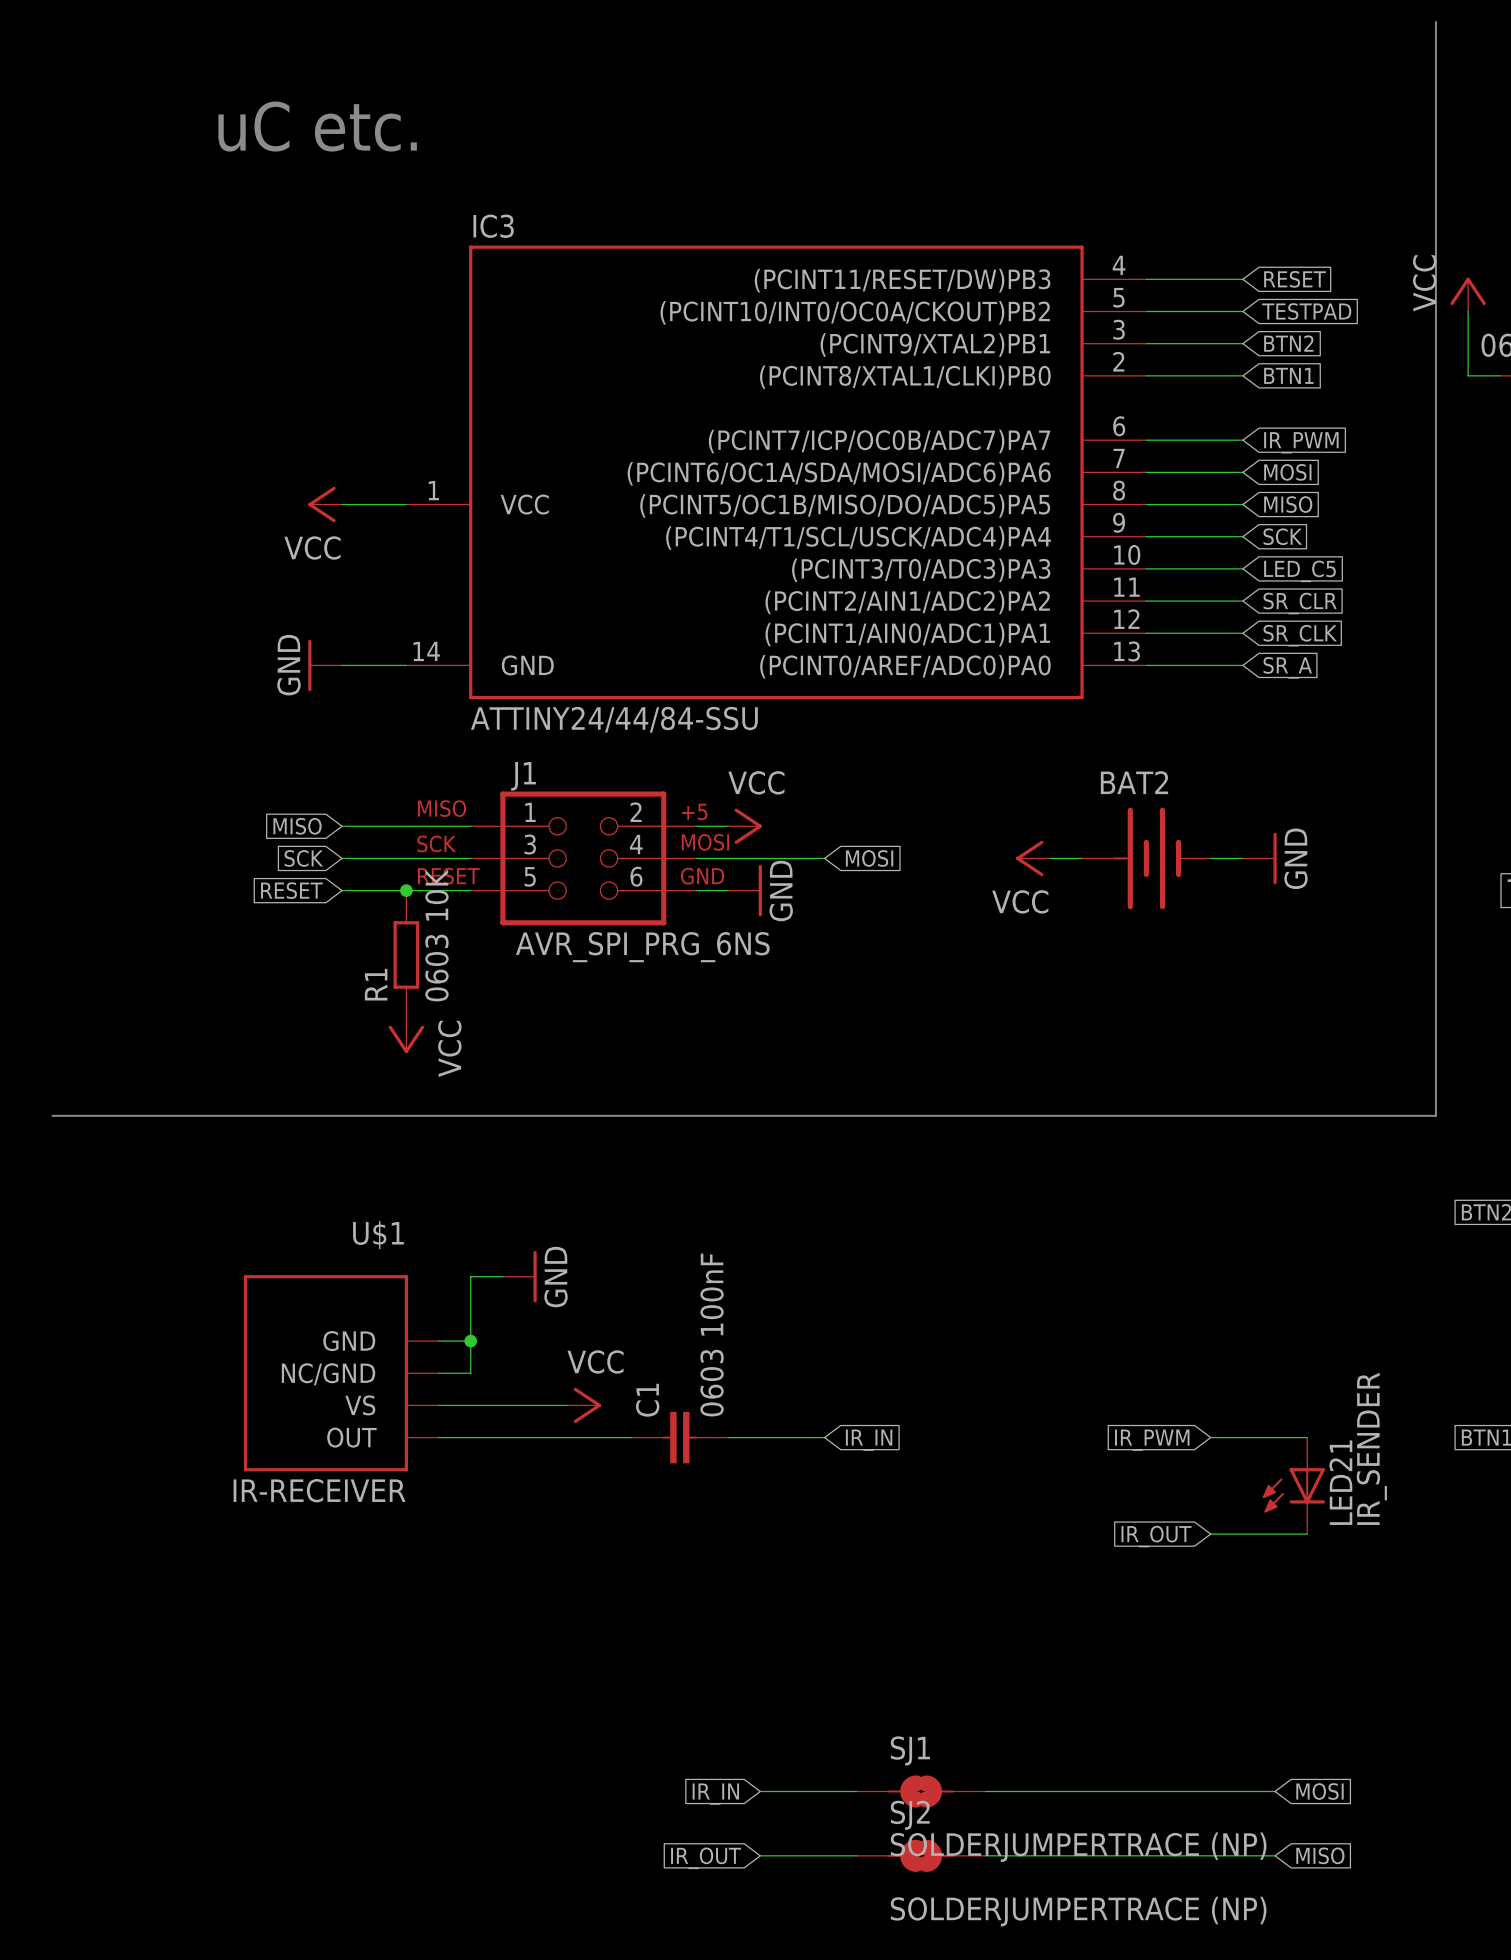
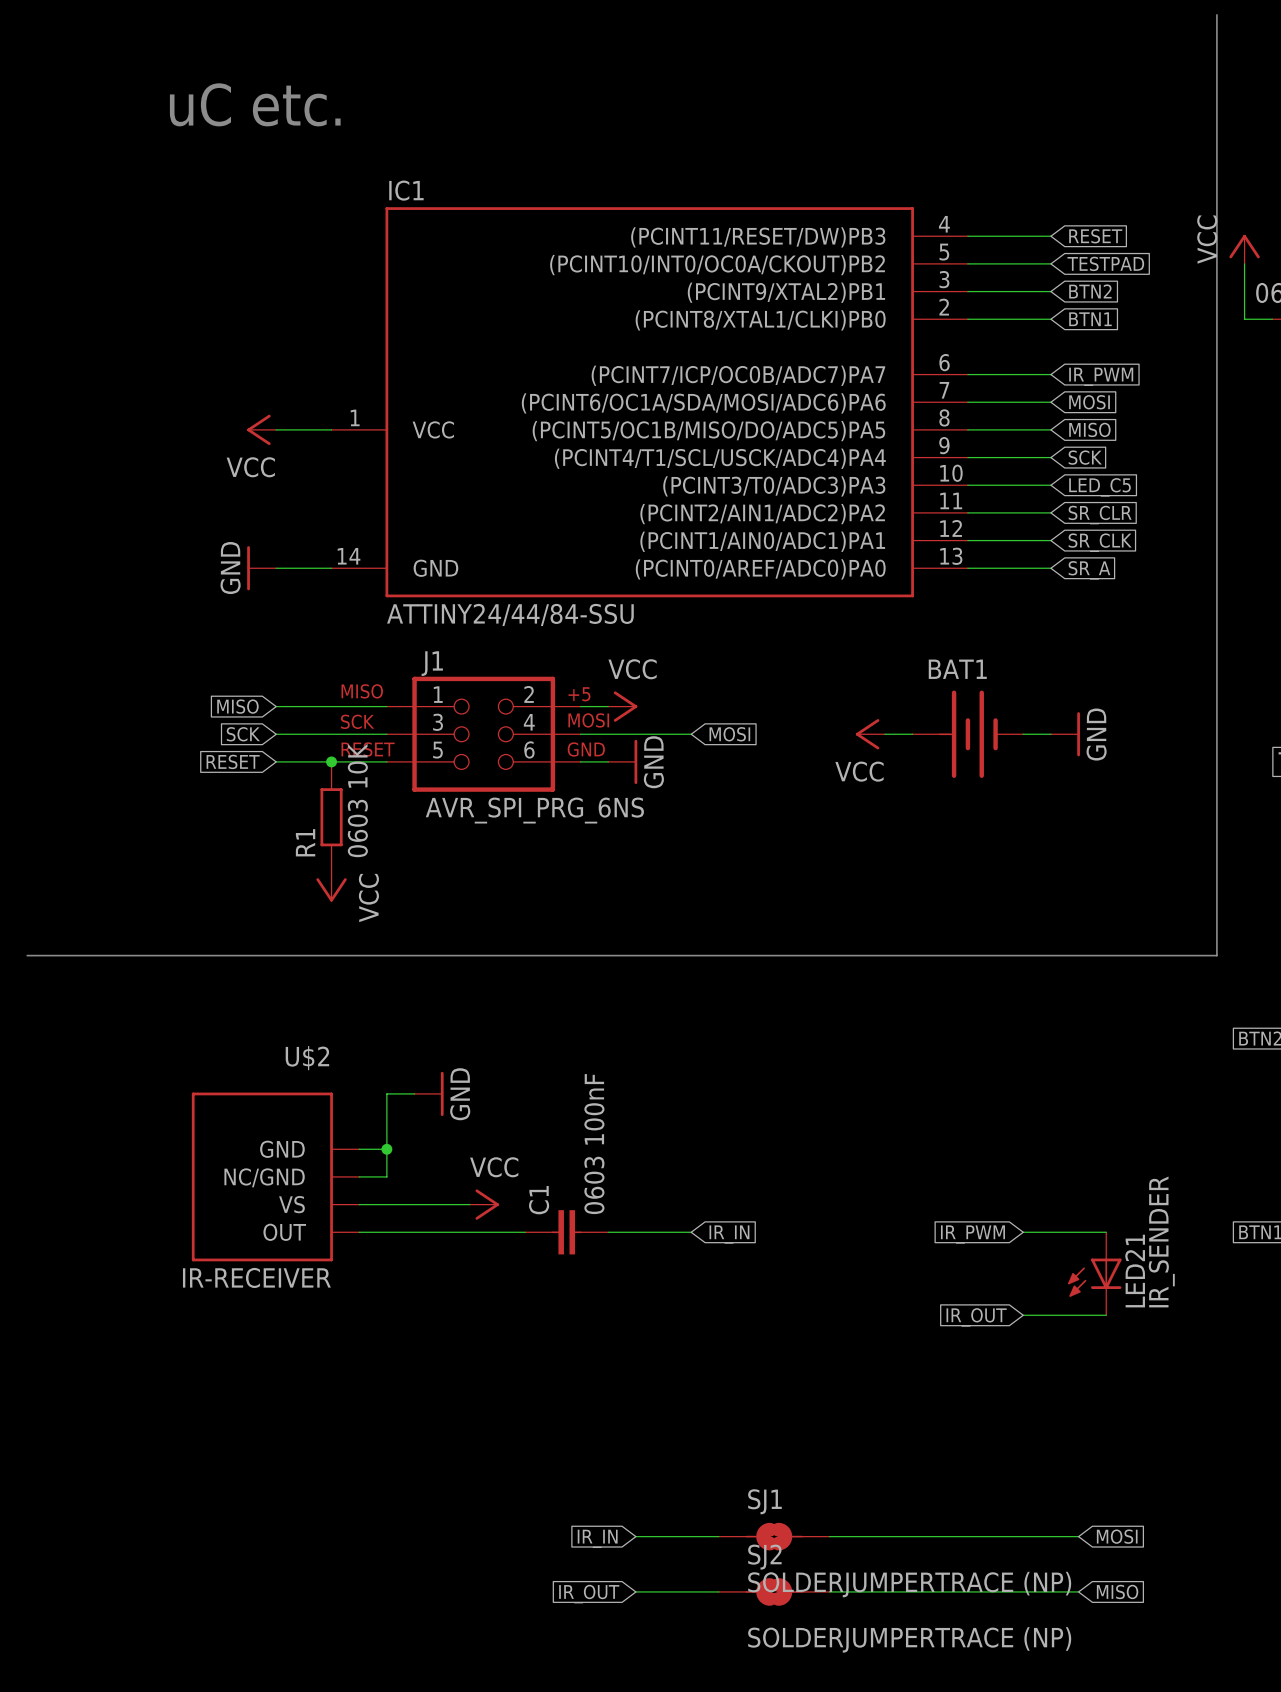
IC3 name: IC3 (493, 226) -> IC1 (406, 190)
BAT2 name: BAT2 (1134, 782) -> BAT1 (957, 669)
U$1 name: U$1 (378, 1235) -> U$2 (307, 1058)

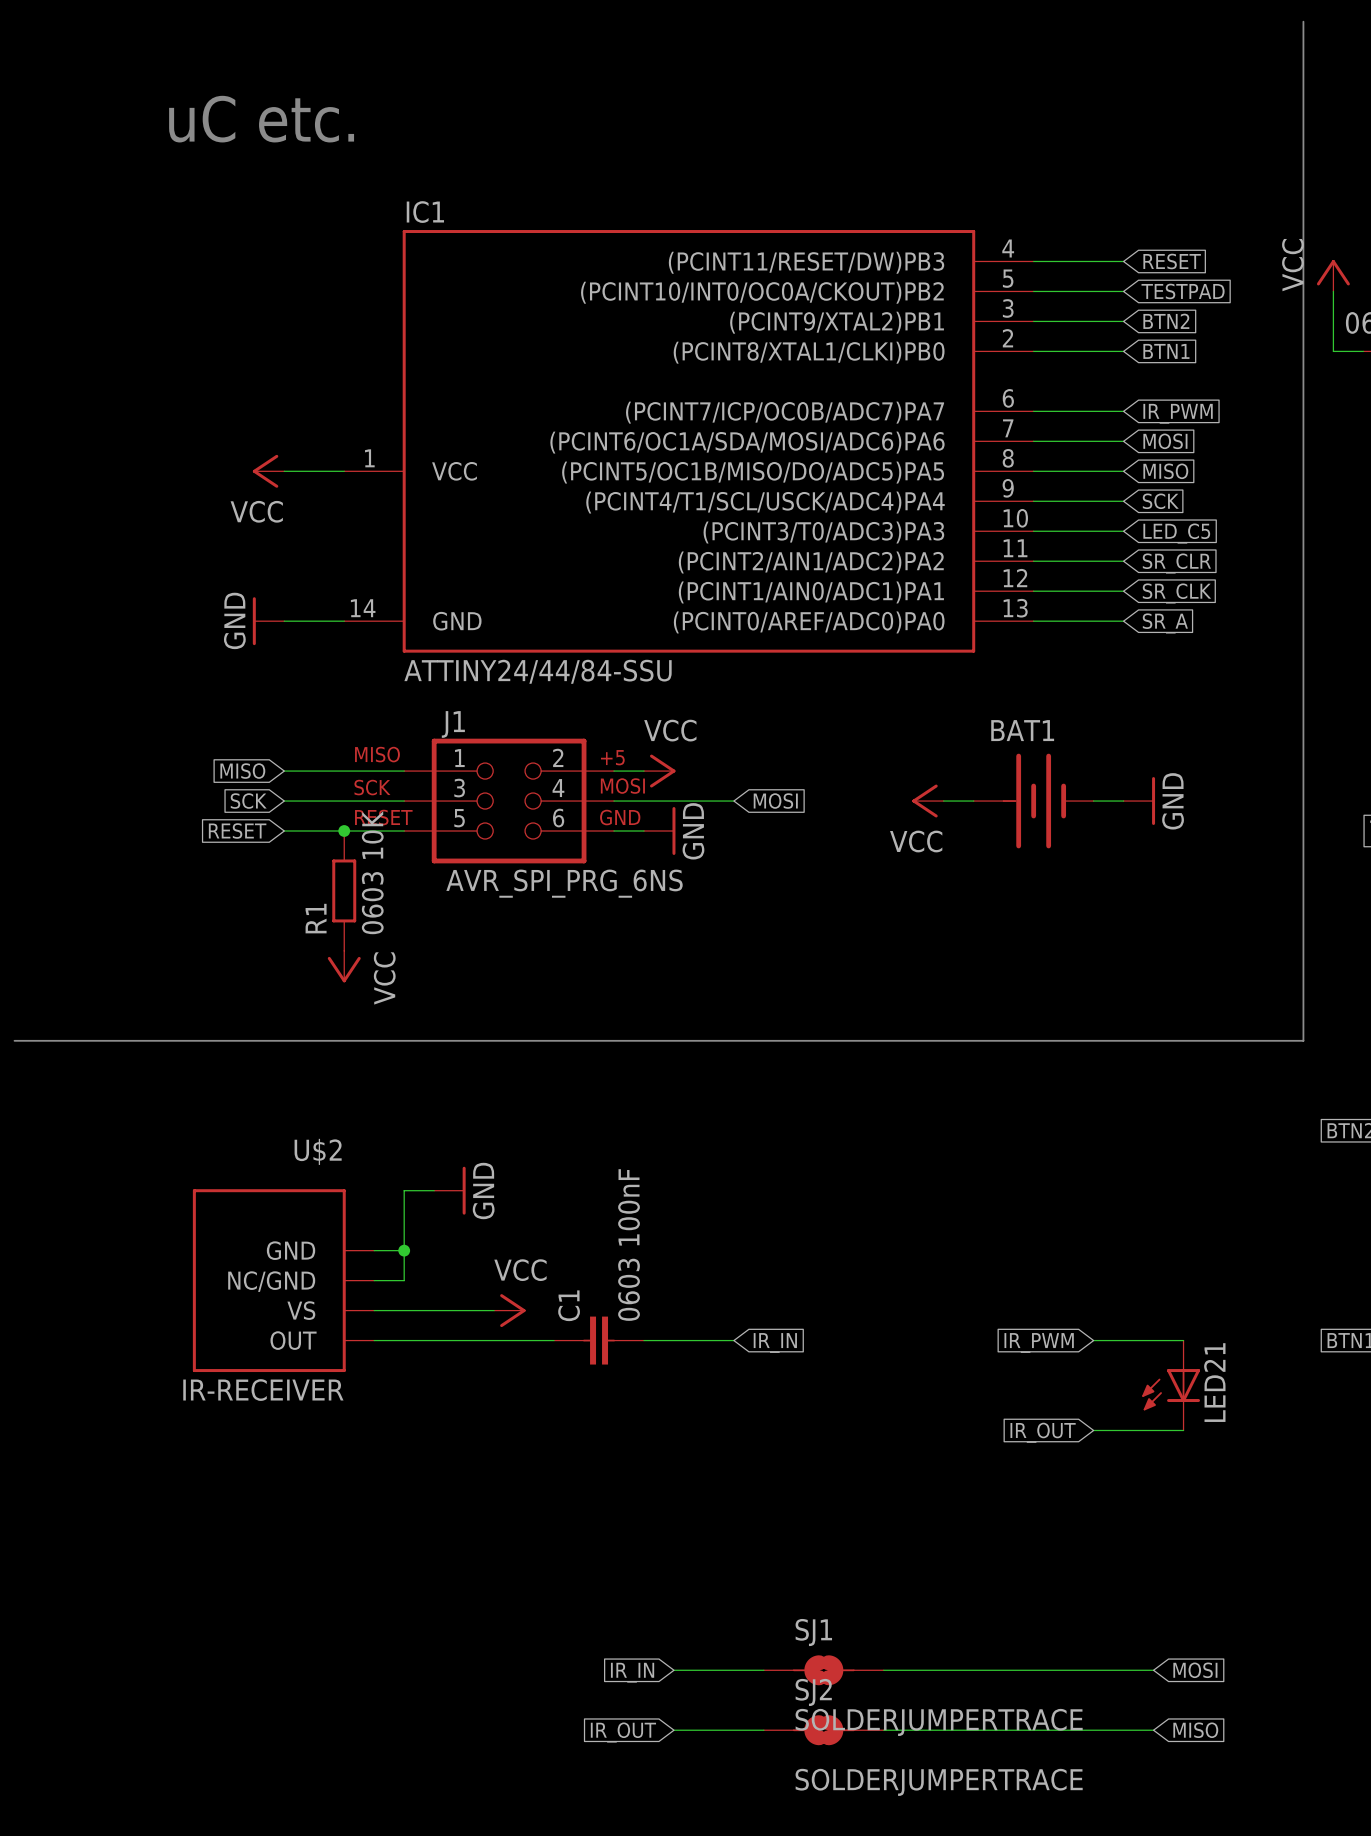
LED21 value: IR_SENDER (1161, 1241) -> none
SJ1 value: SOLDERJUMPERTRACE (NP) (909, 1584) -> SOLDERJUMPERTRACE (939, 1722)
SJ2 value: SOLDERJUMPERTRACE (NP) (909, 1639) -> SOLDERJUMPERTRACE (939, 1782)

